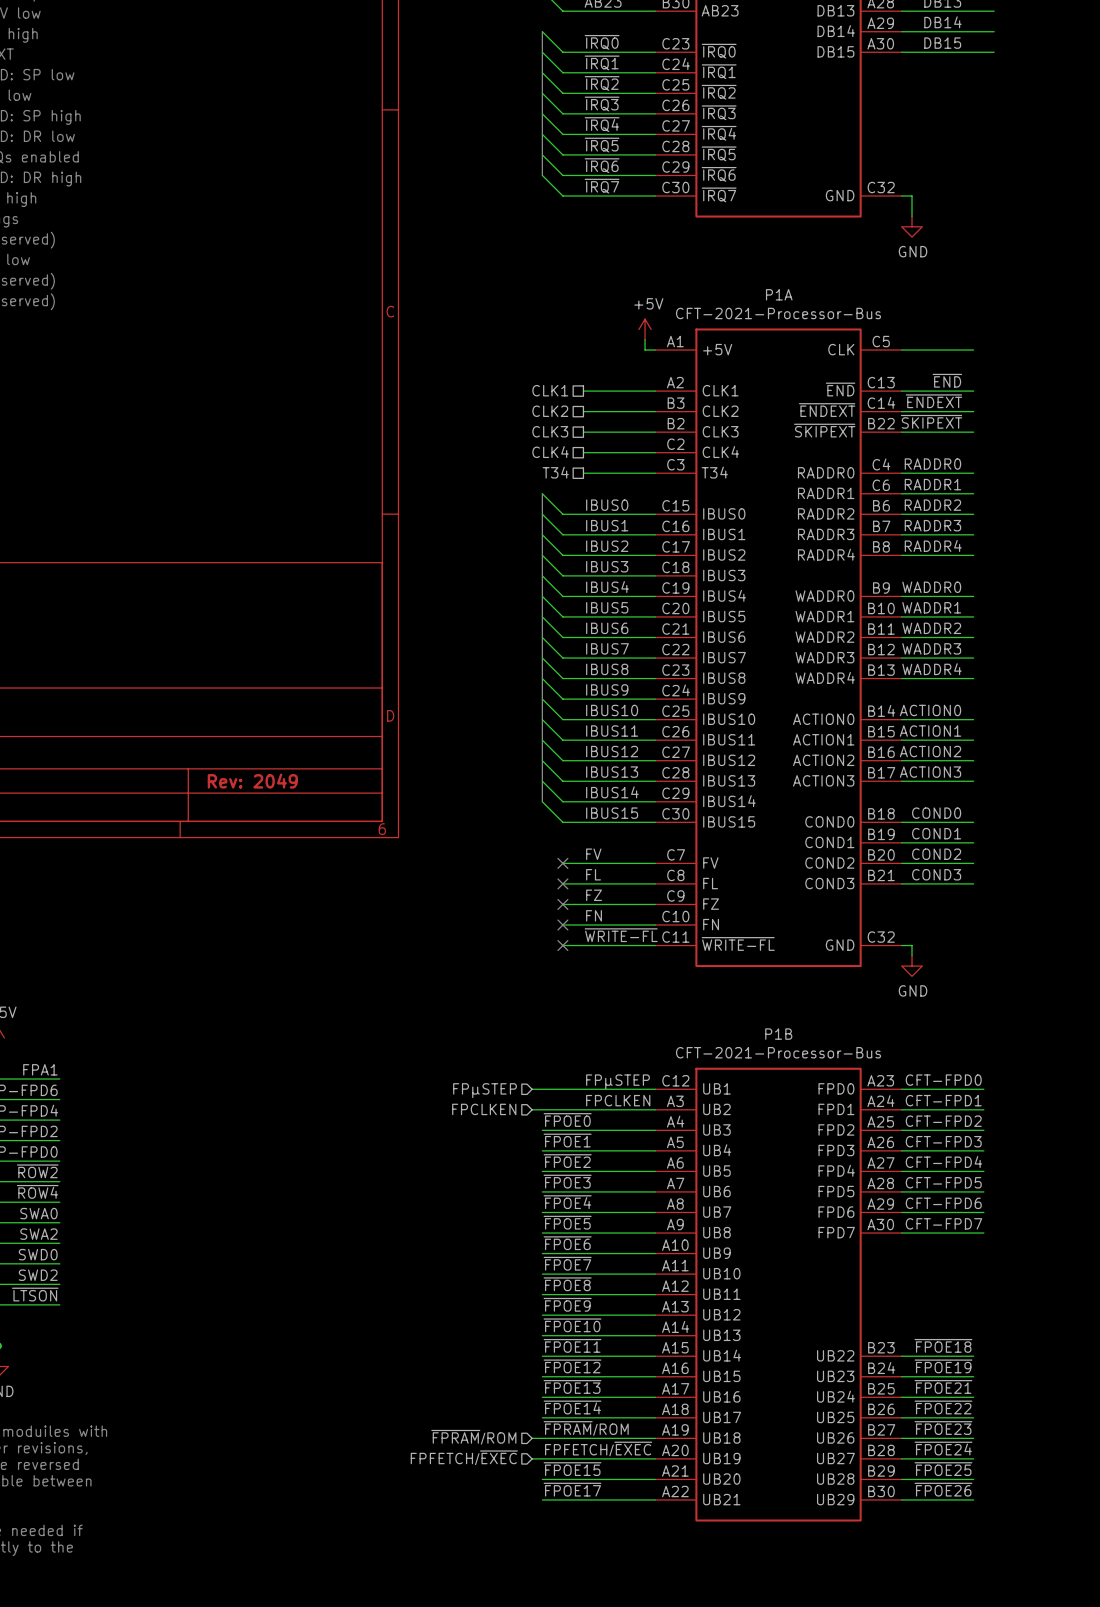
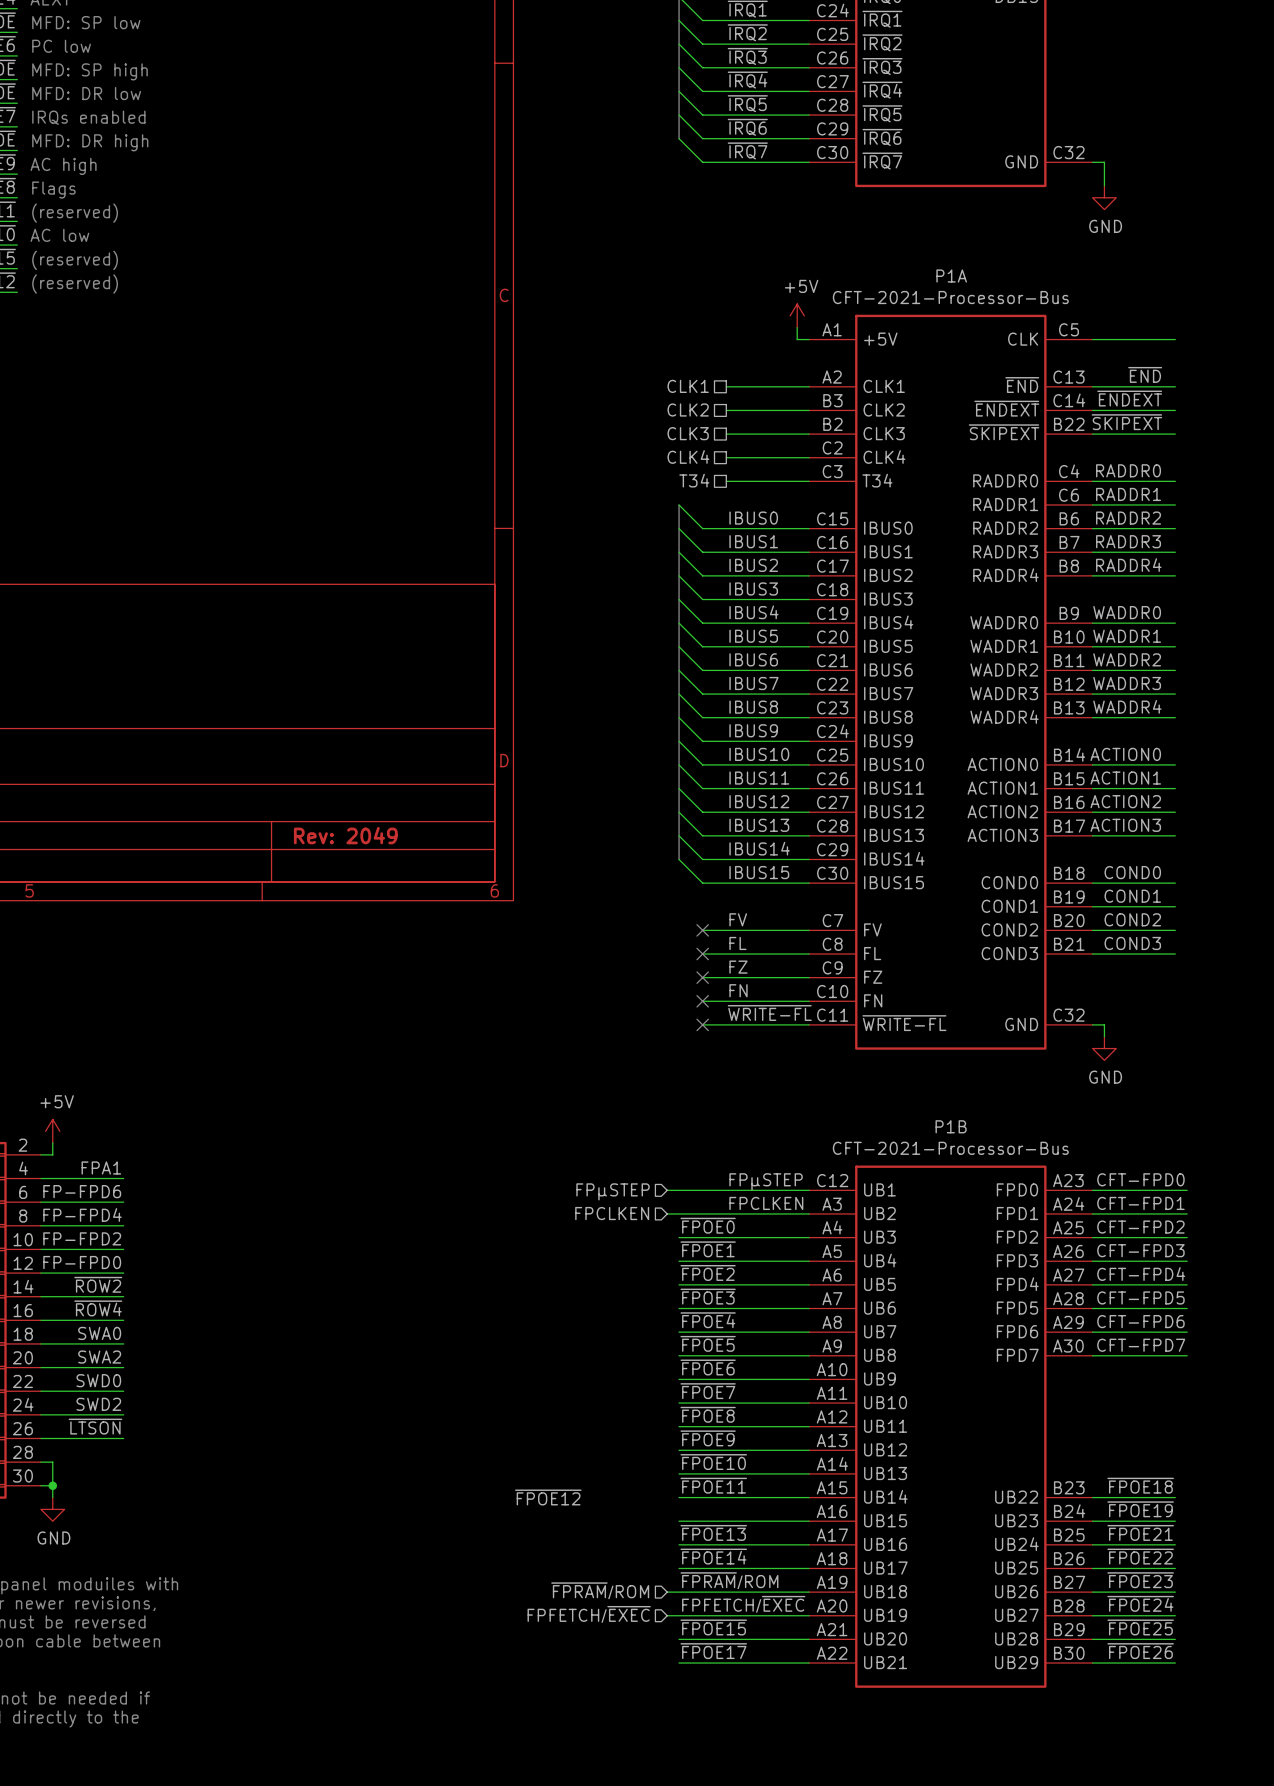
label position: ~{FPOE12} (572, 1366) -> ~{FPOE12} (548, 1497)

